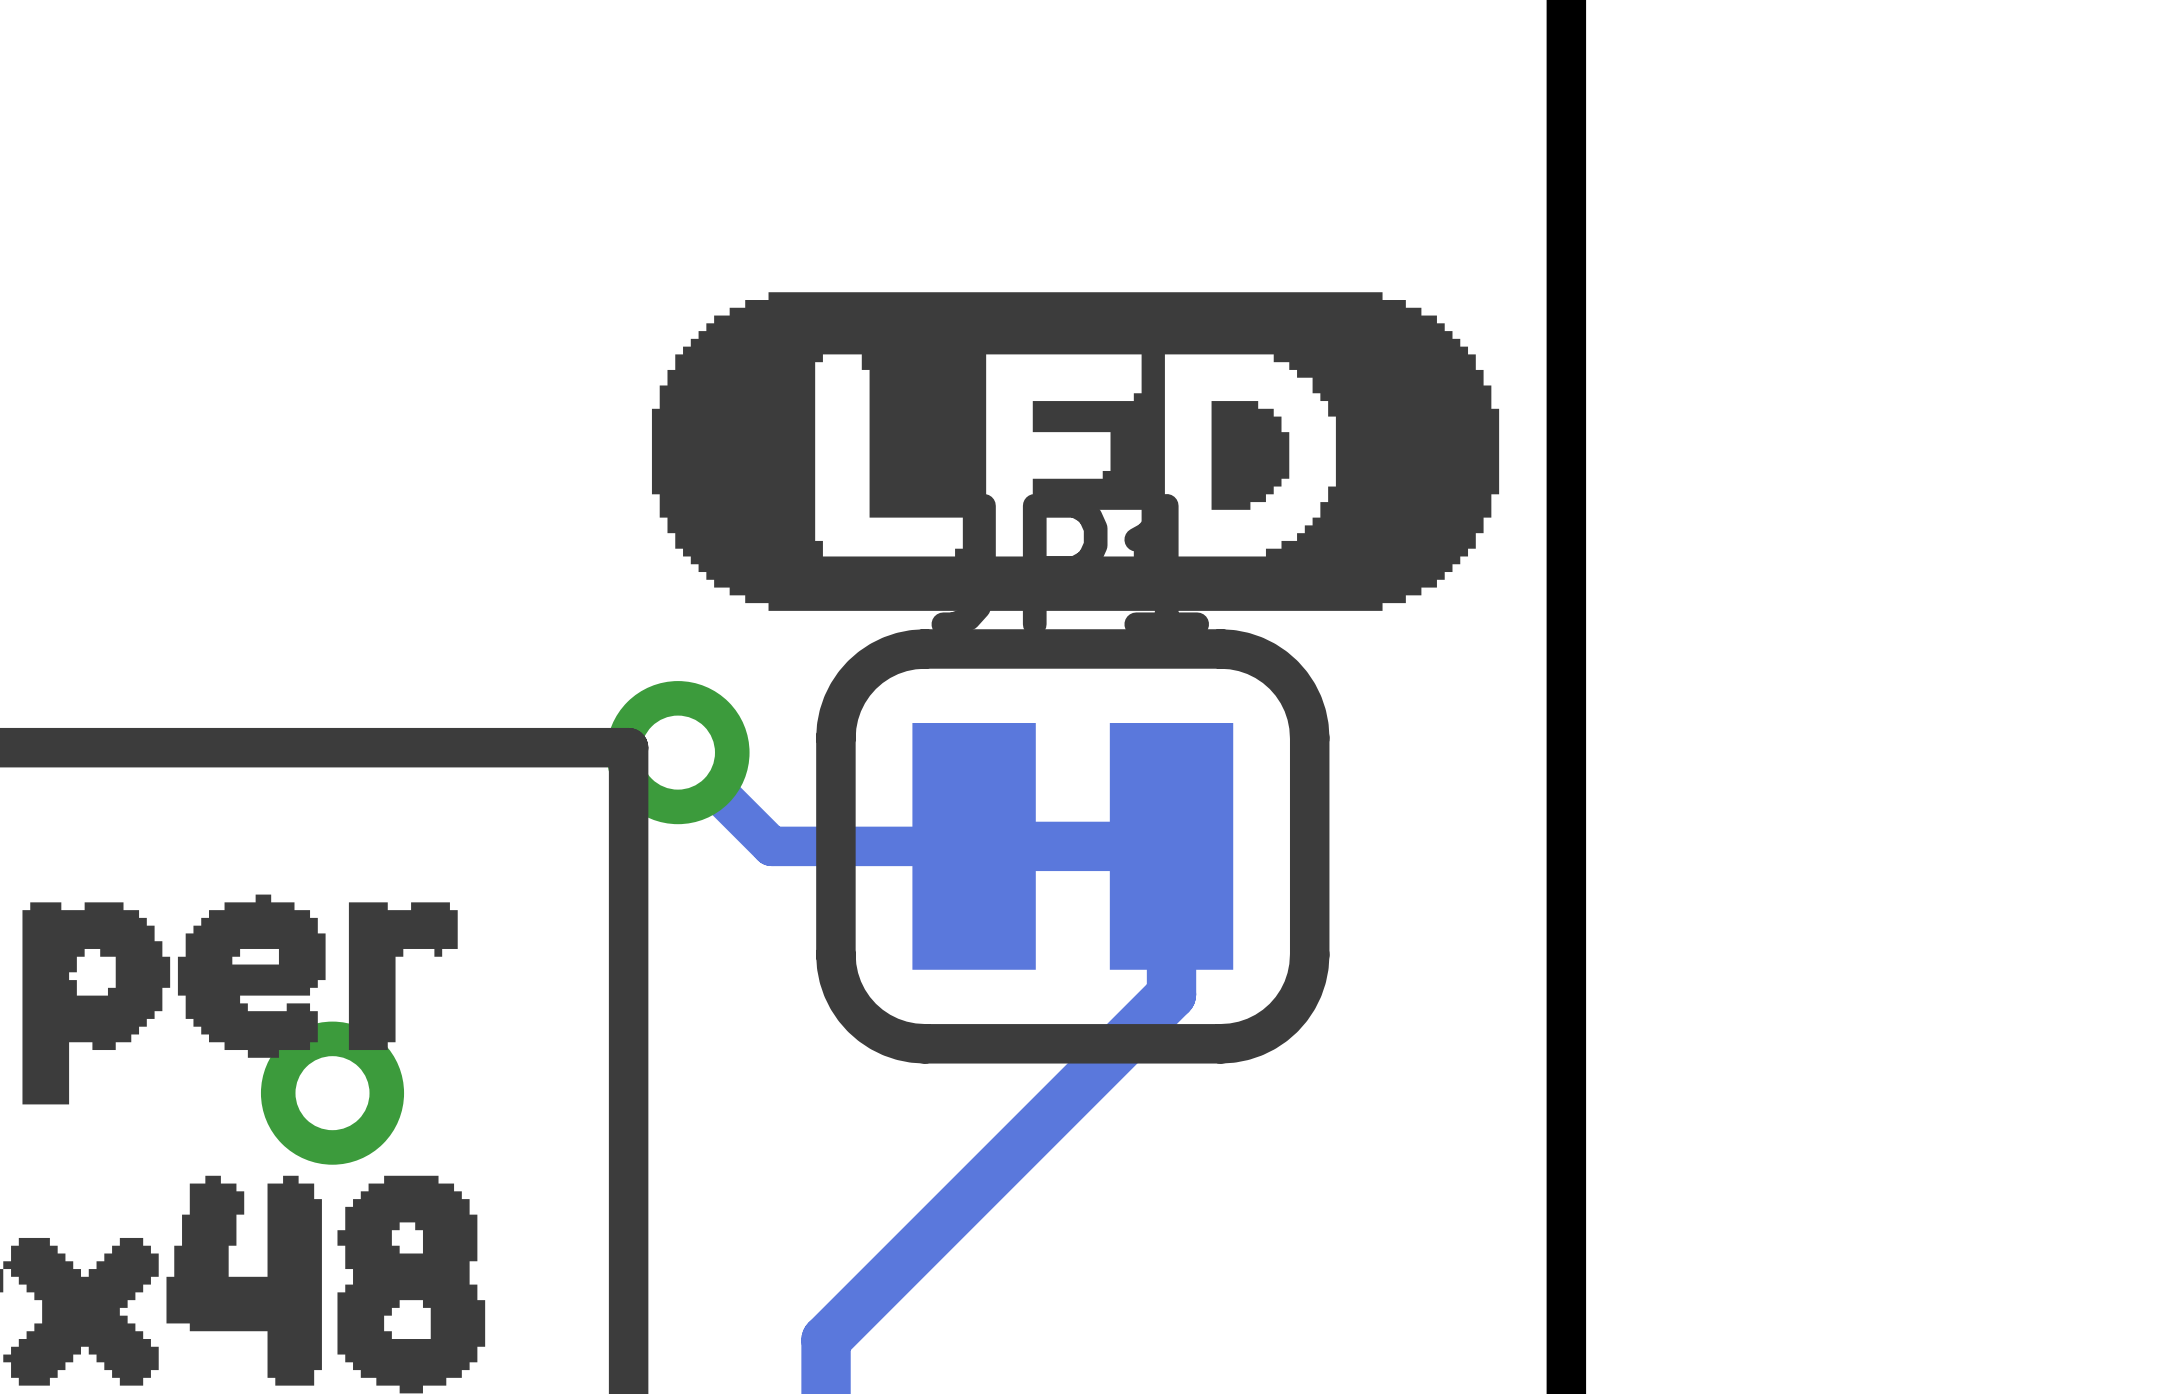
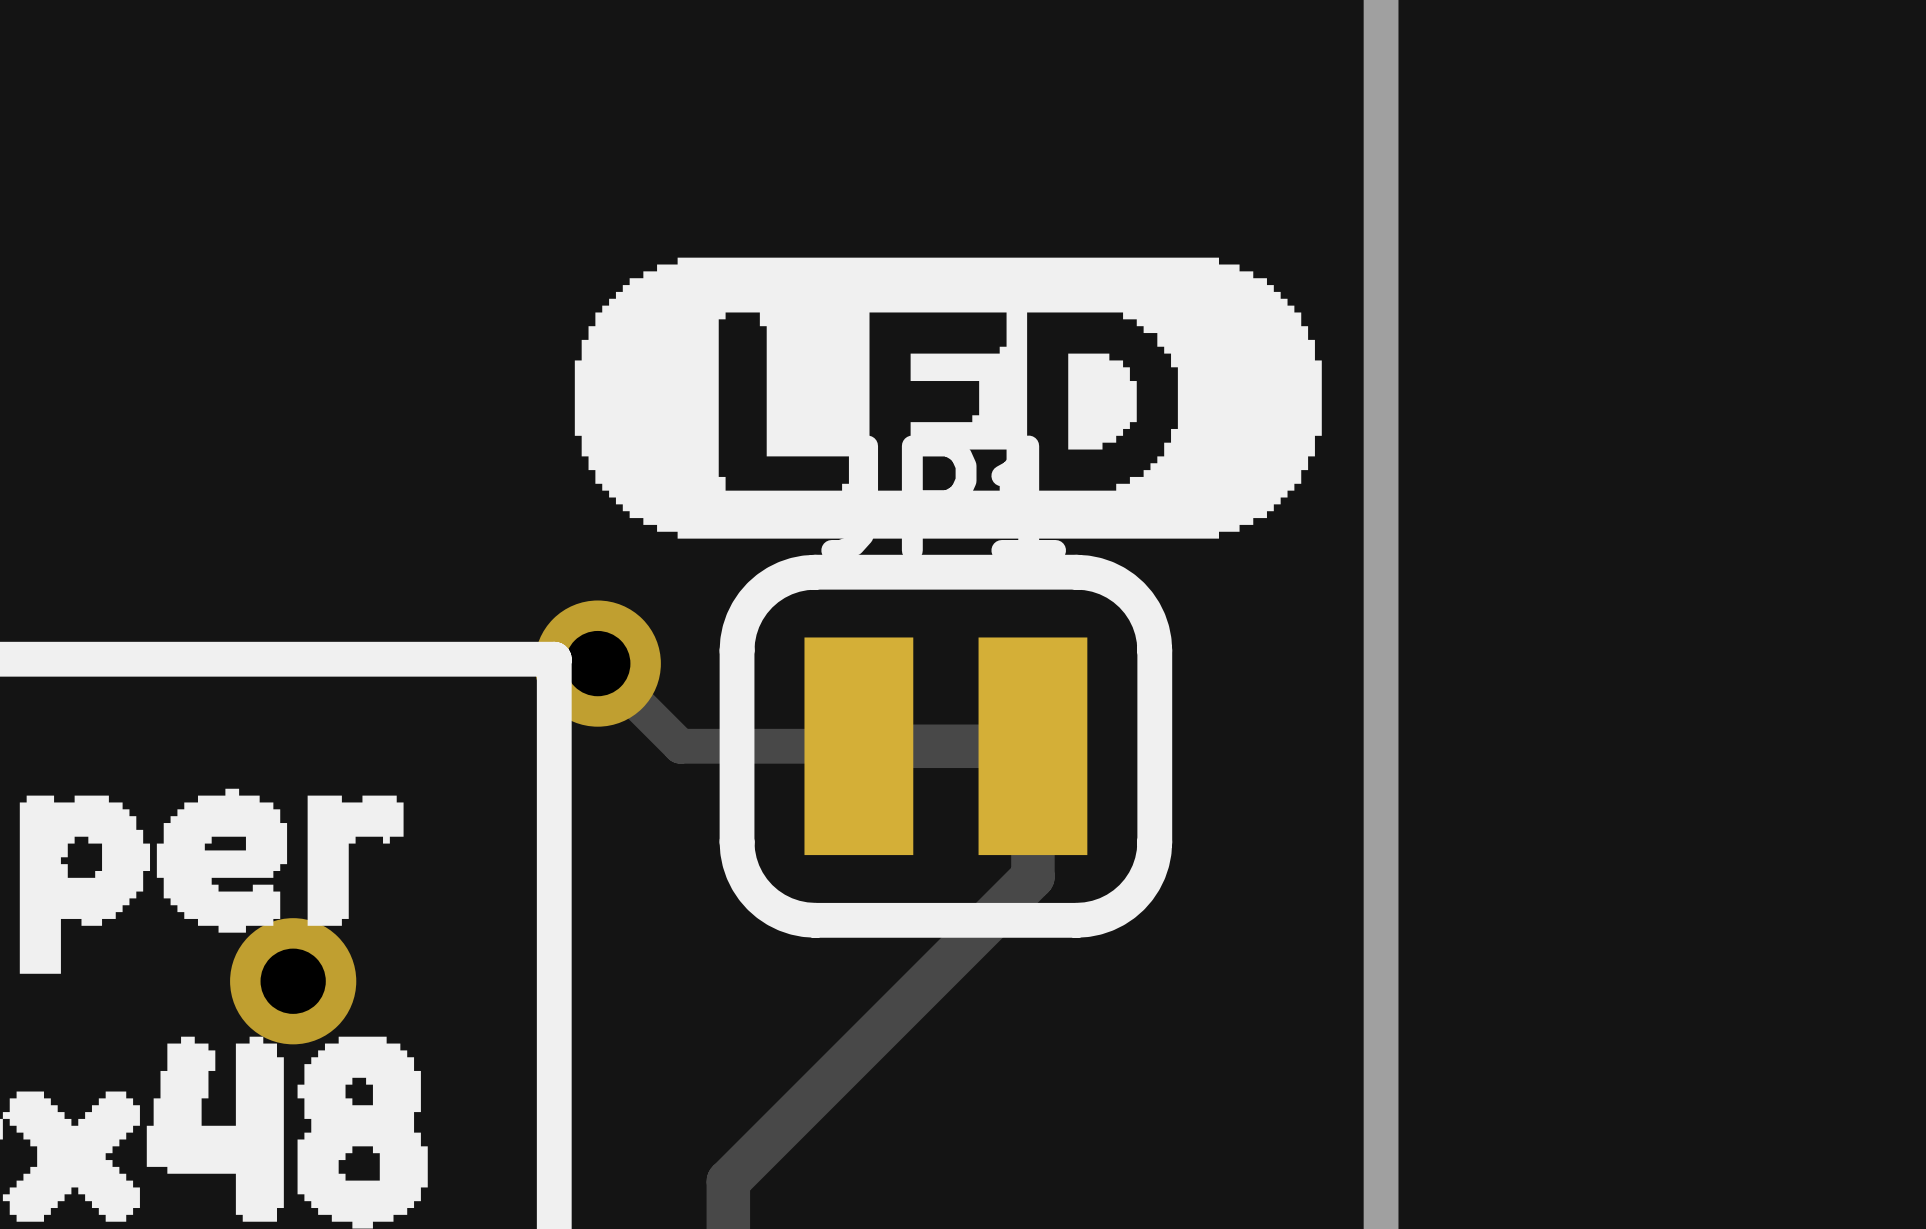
via position: (332, 1093) -> (293, 981)

